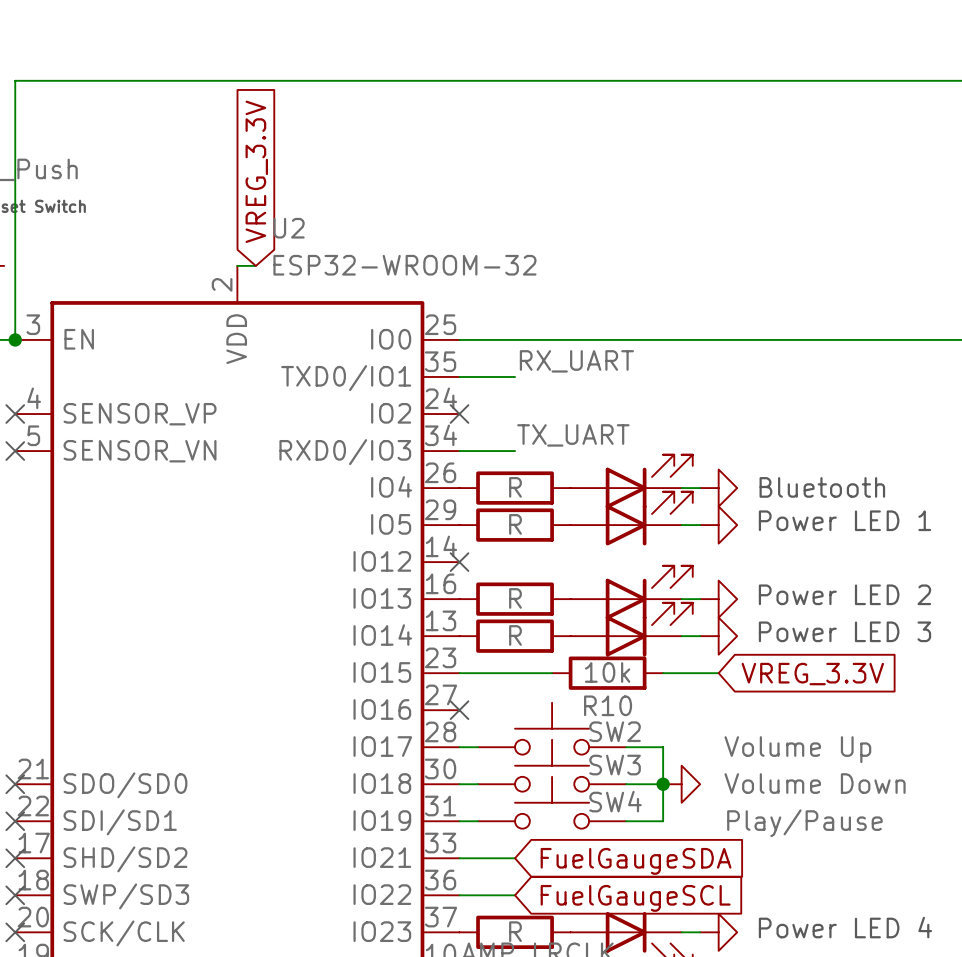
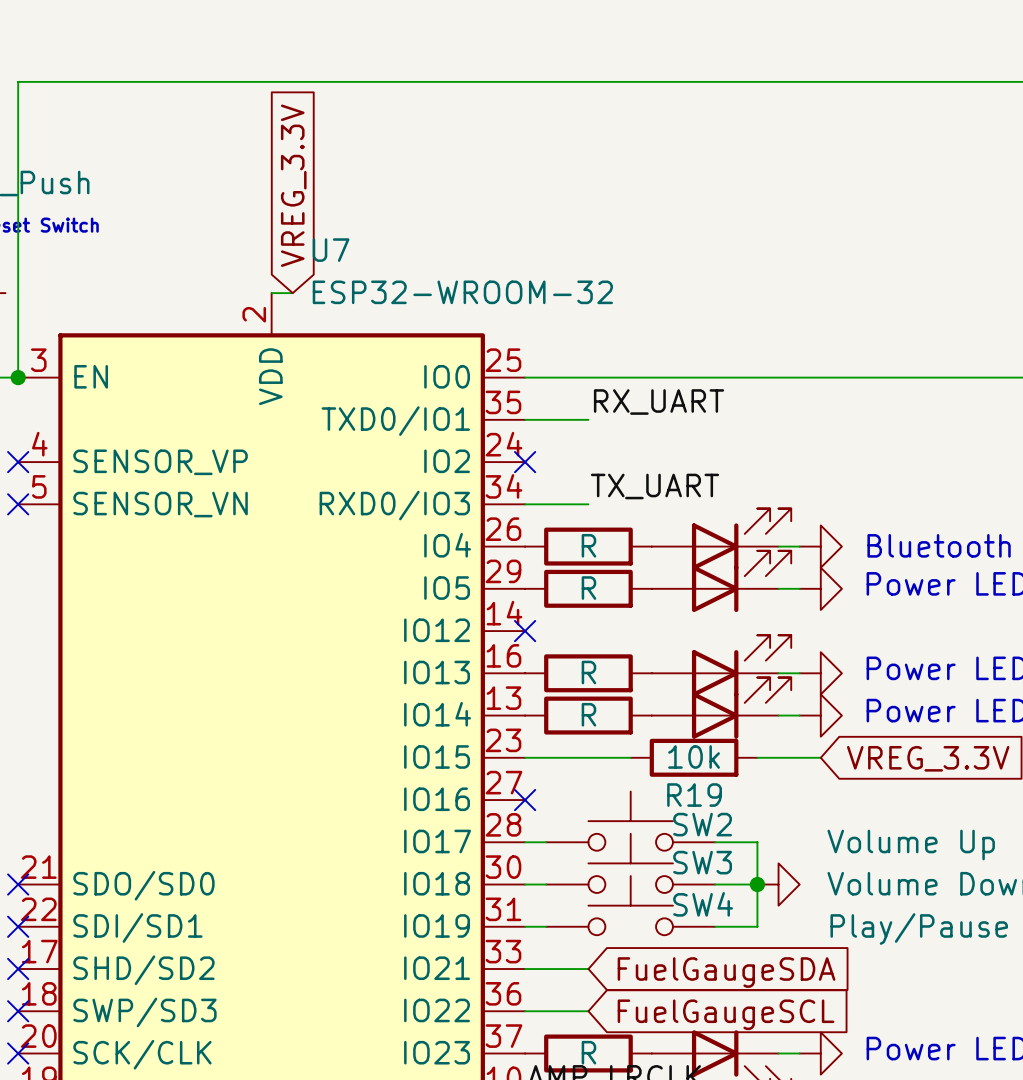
U2 name: U2 (289, 228) -> U7 (331, 250)
R10 name: R10 (608, 705) -> R19 (694, 795)

